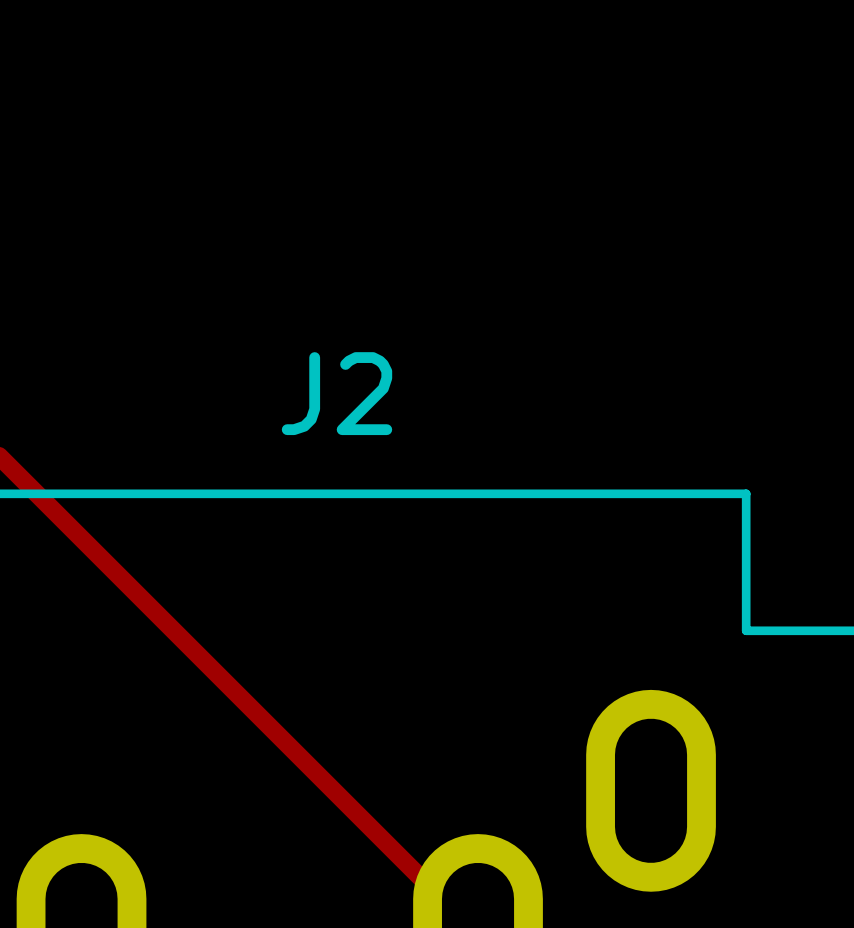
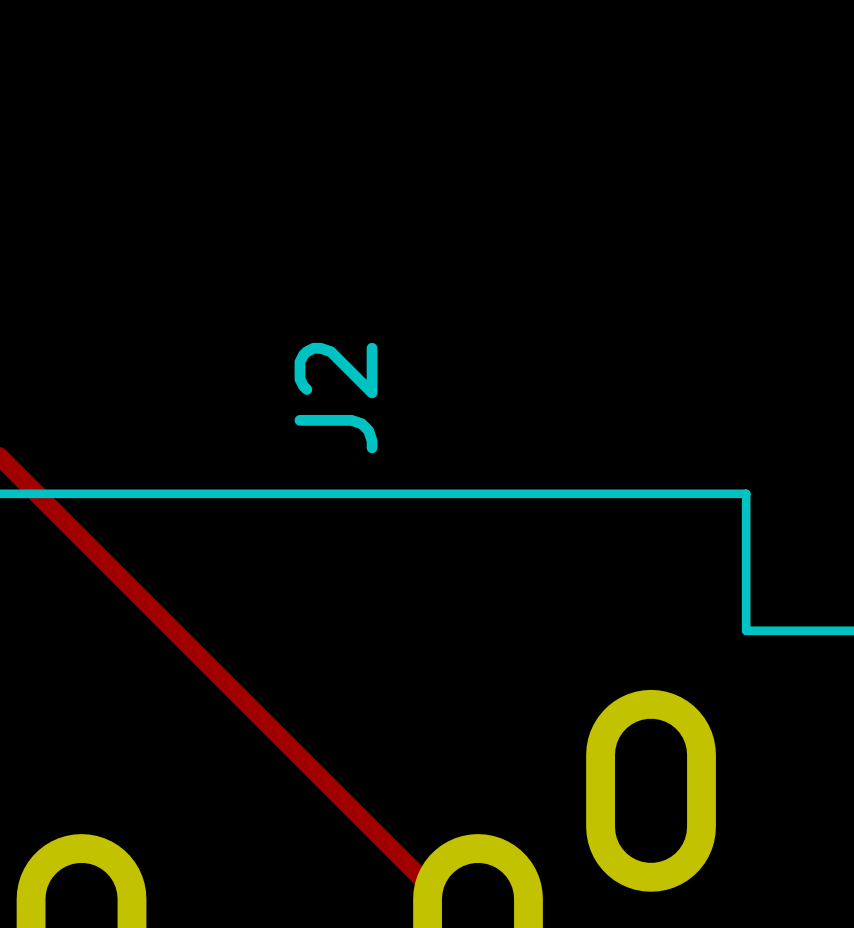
J2 name rotation: 0° (336, 393) -> 90° counterclockwise (336, 398)

